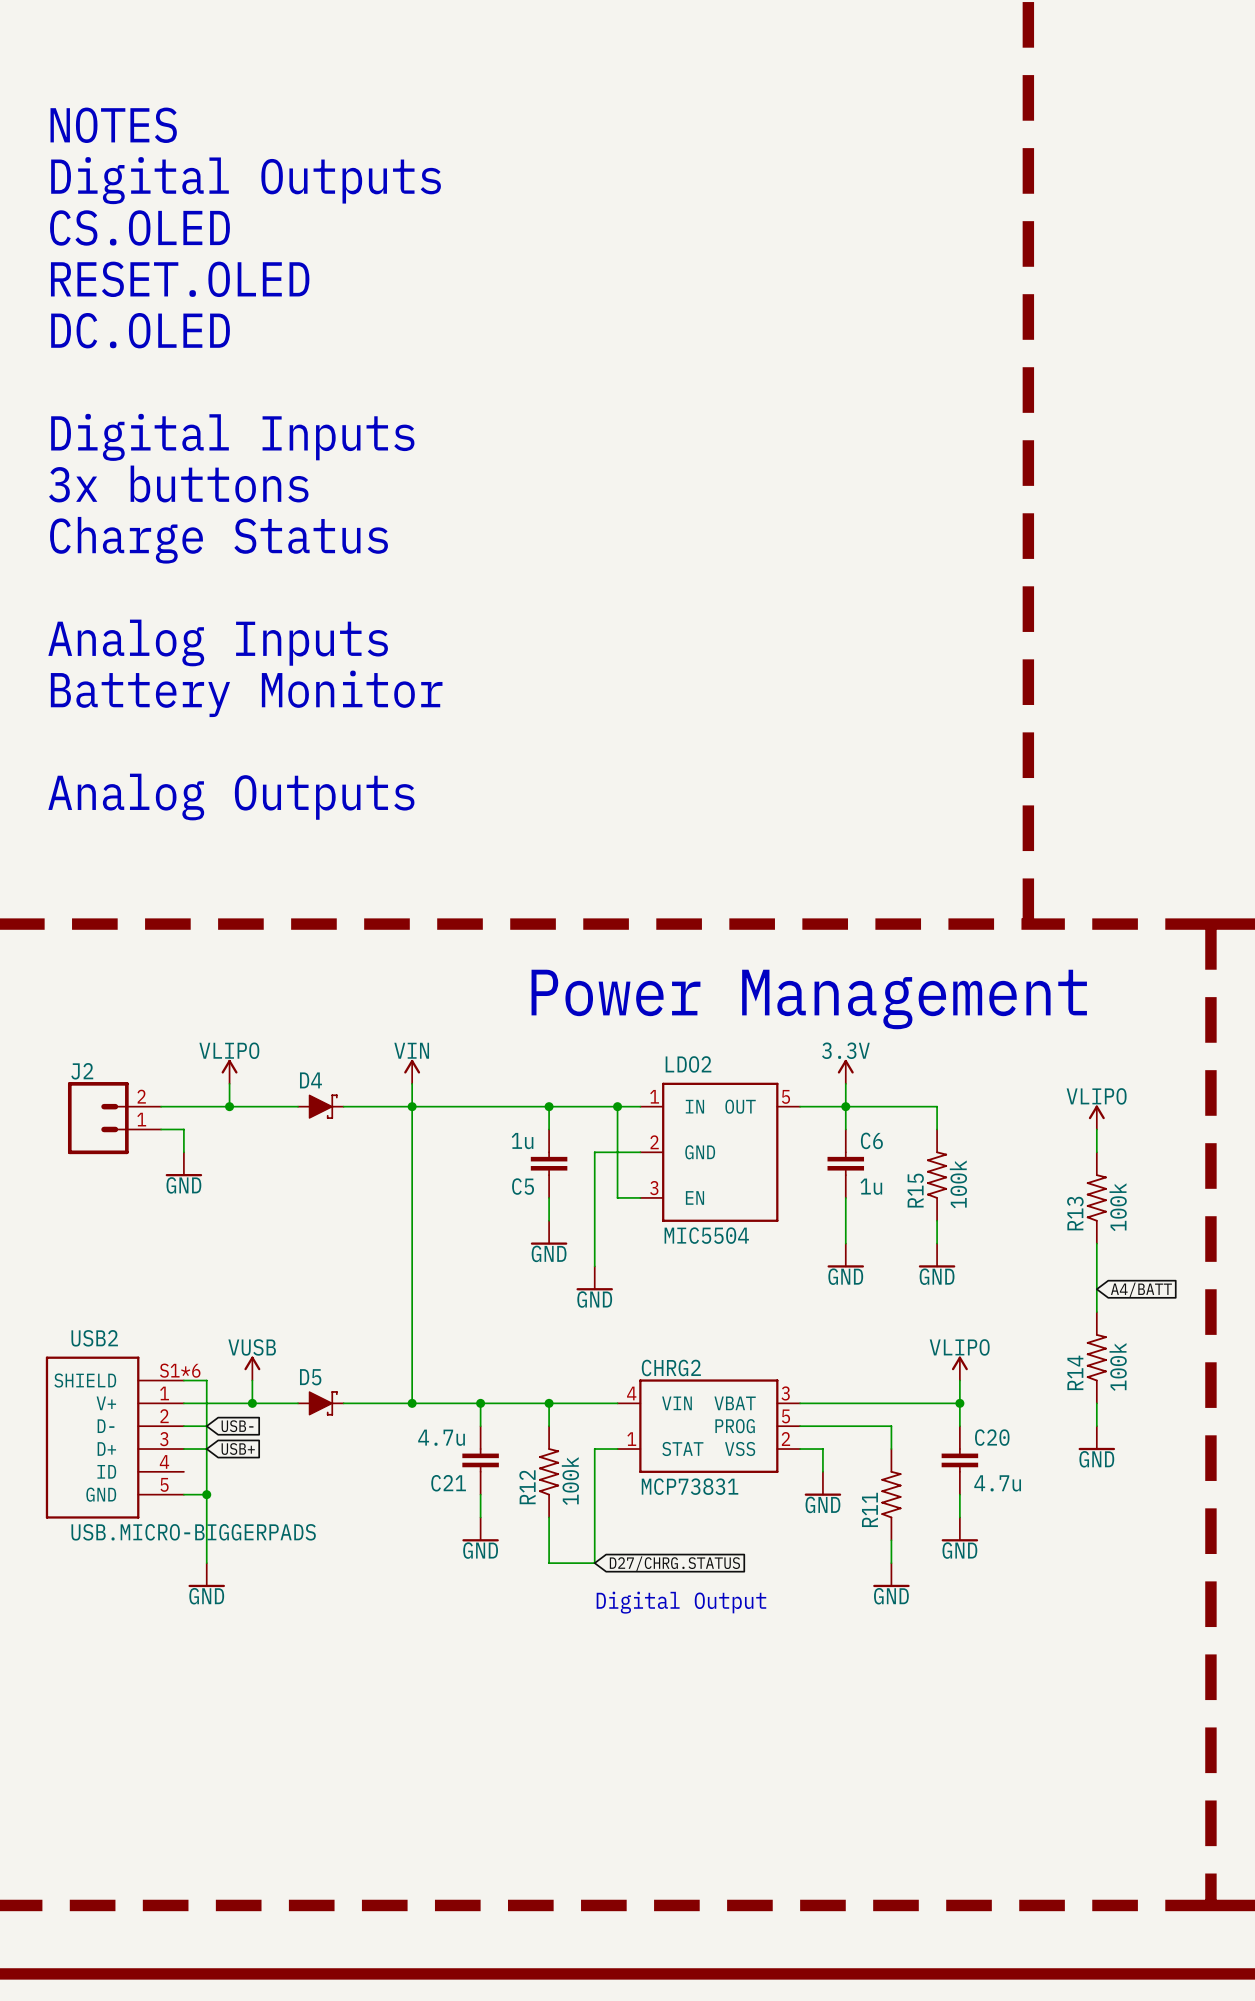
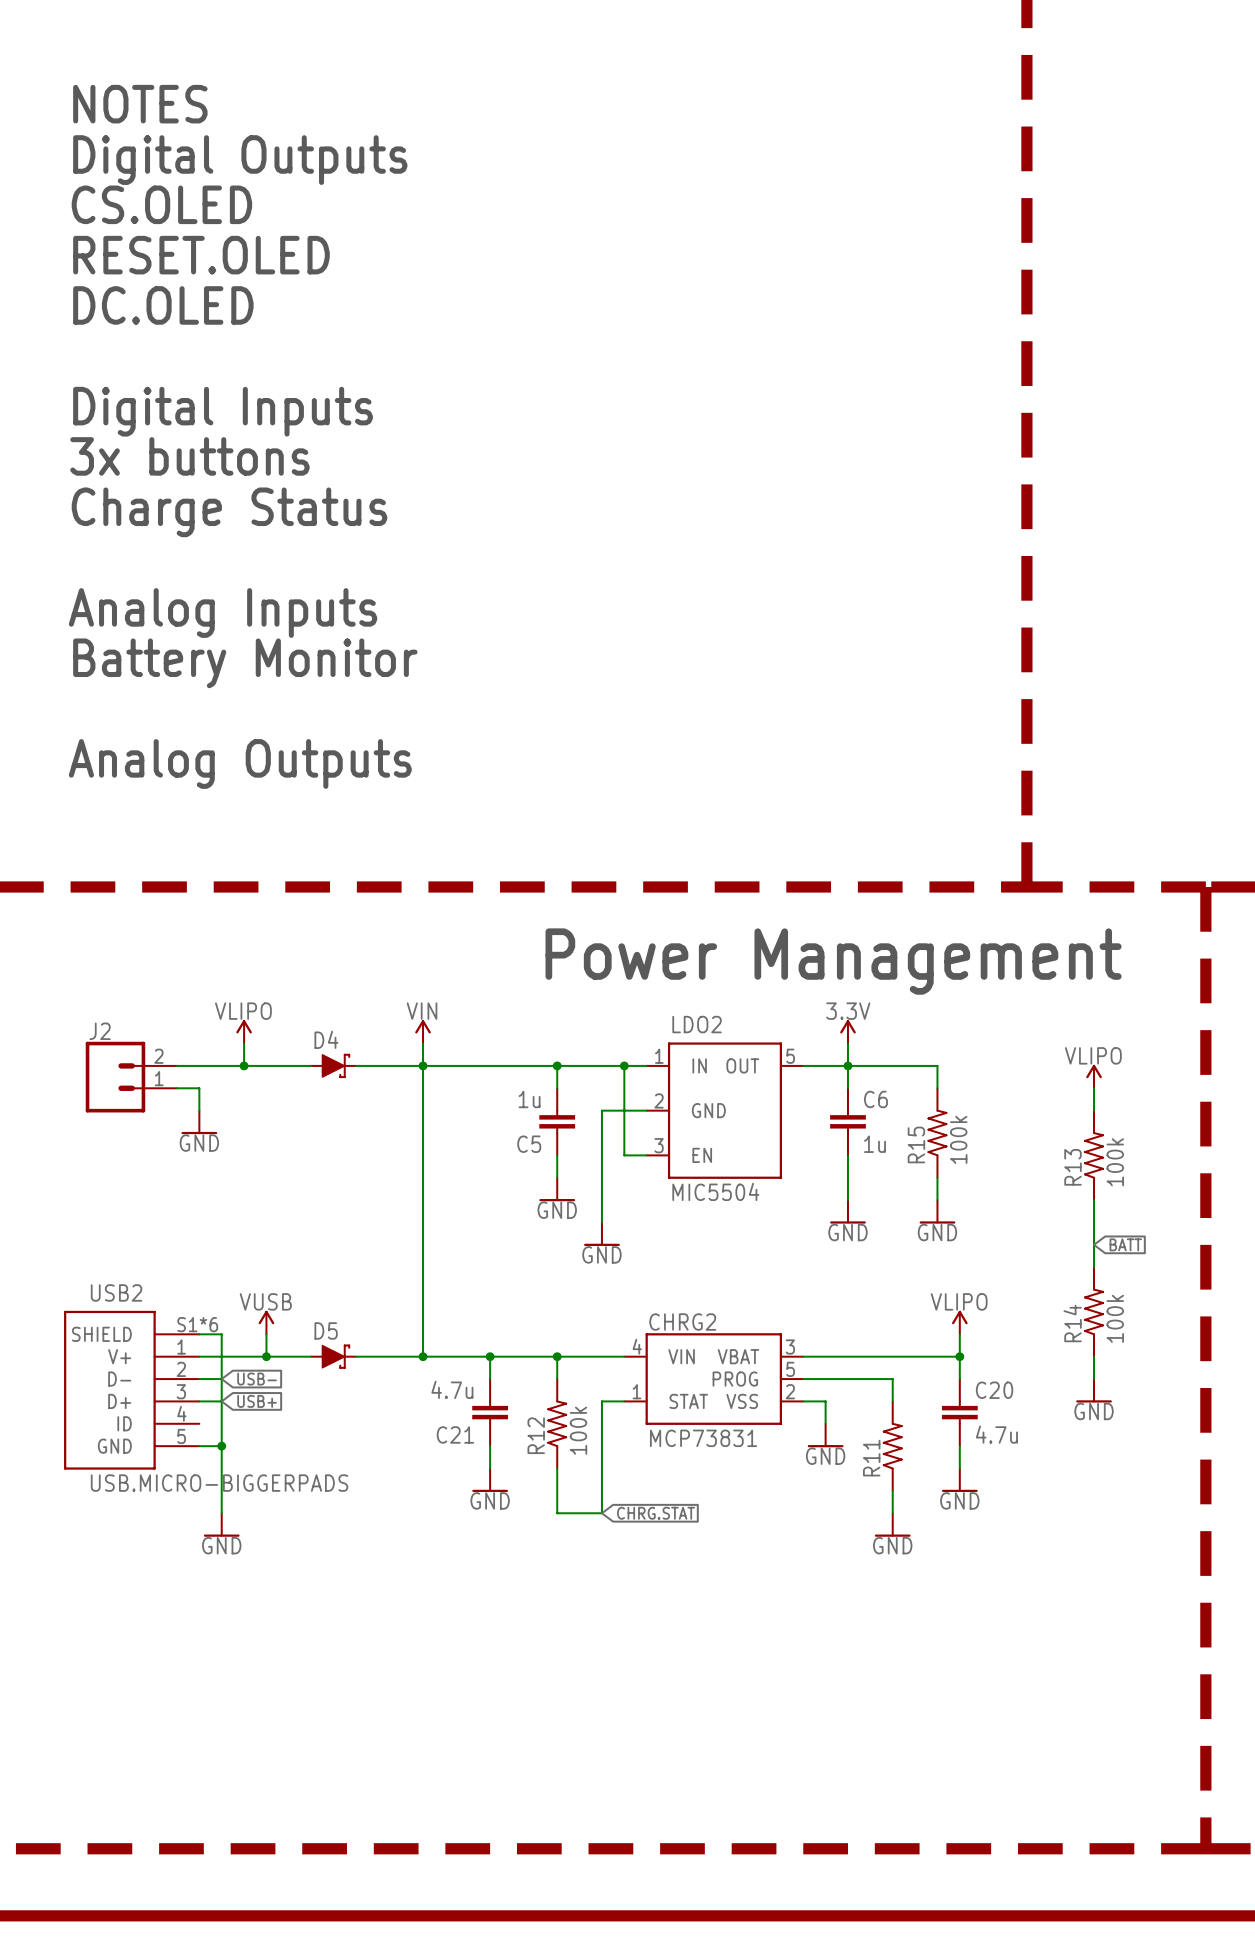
global label: A4/BATT (1141, 1289) -> BATT (1125, 1244)
global label: D27/CHRG.STATUS (674, 1563) -> CHRG.STAT (655, 1513)
text: Digital Output (681, 1602) -> none

